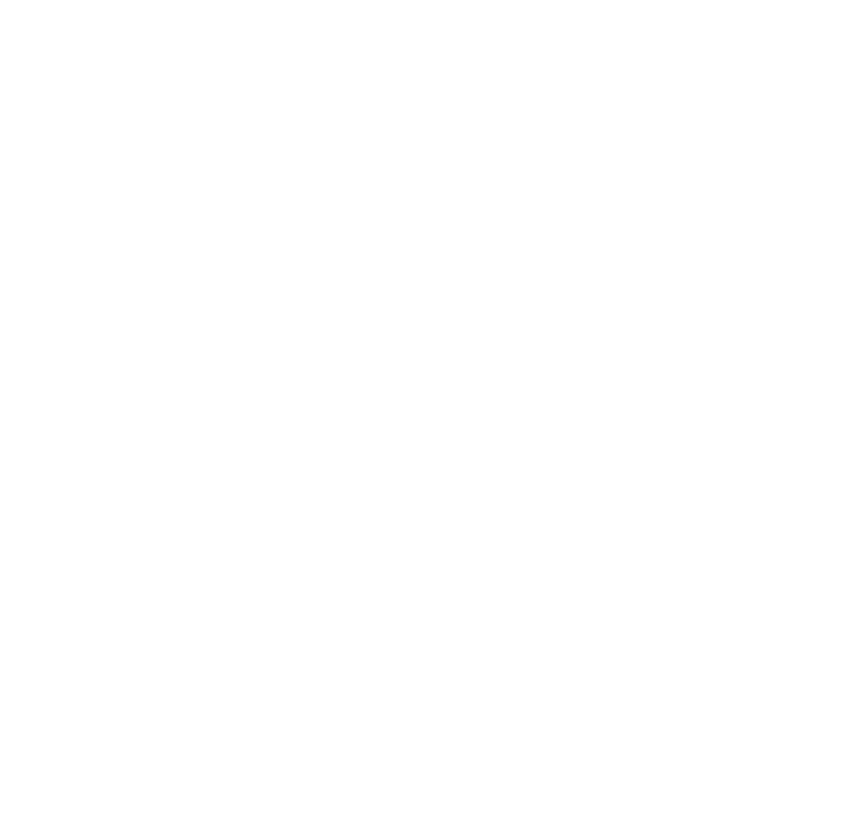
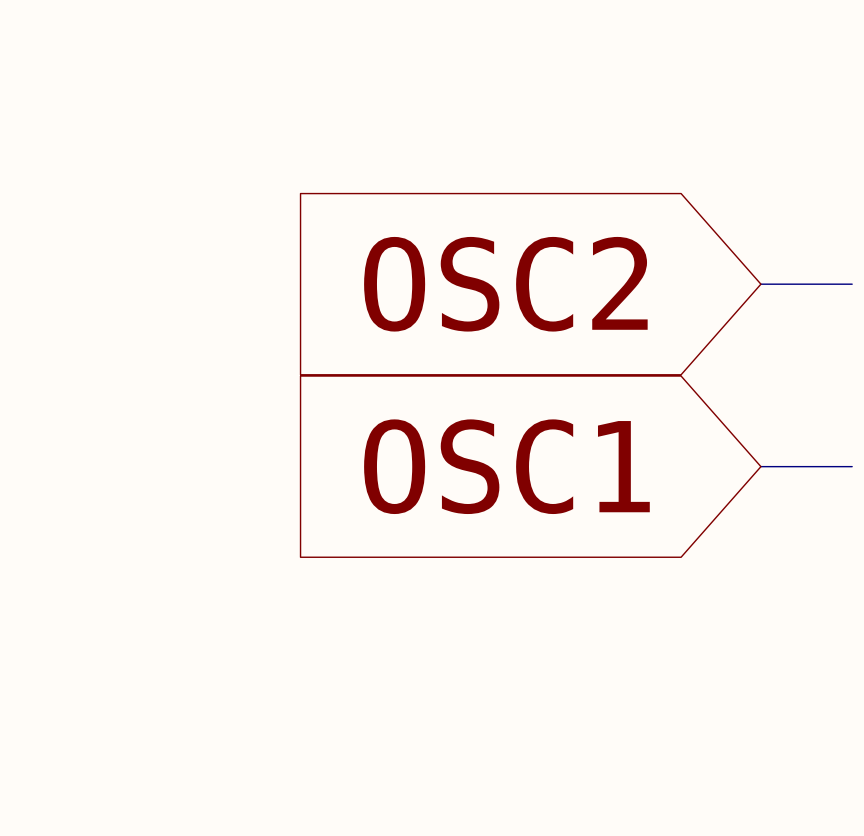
global label: none -> OSC2 (505, 284)
wire: none -> (760, 284) (852, 284)
global label: none -> OSC1 (506, 466)
wire: none -> (760, 466) (852, 466)

